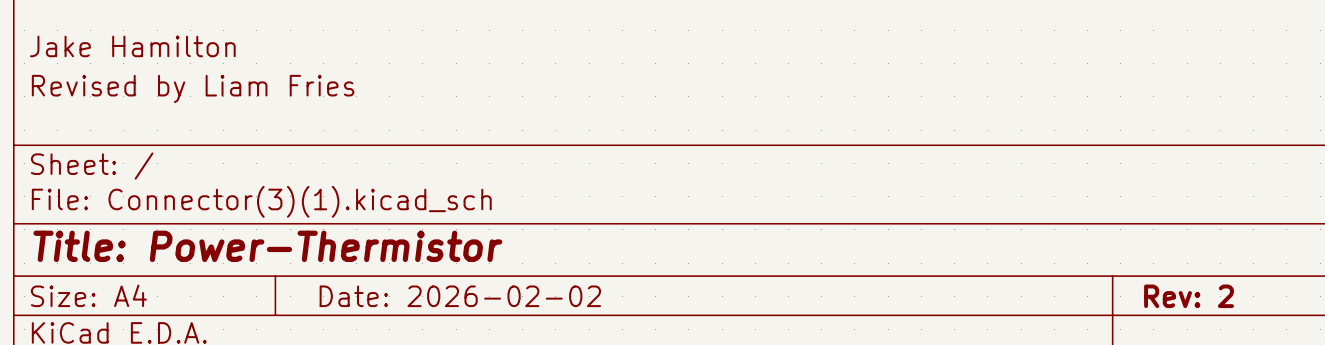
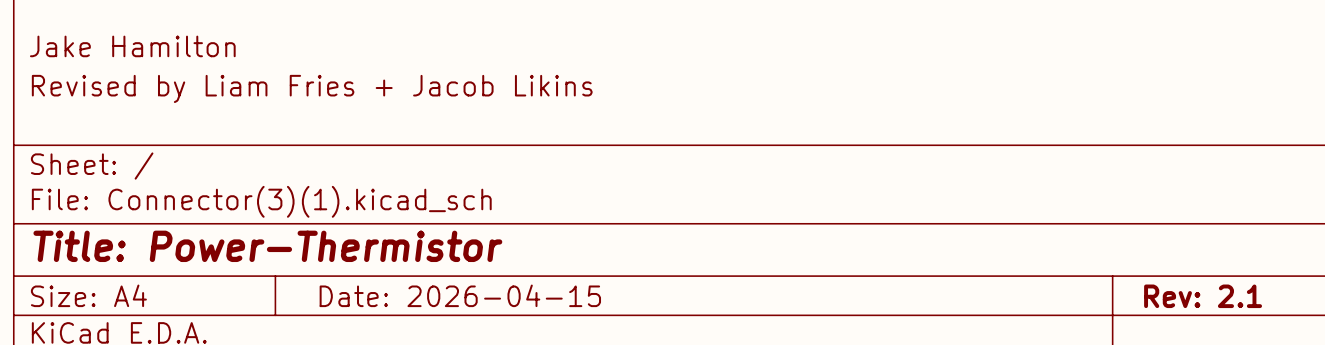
title block: Revised by Liam Fries (193, 88) -> Revised by Liam Fries + Jacob Likins (312, 88)
title block: Date: 2026-02-02 (460, 296) -> Date: 2026-04-15 (460, 295)
title block: Rev: 2 (1189, 296) -> Rev: 2.1 (1203, 296)

